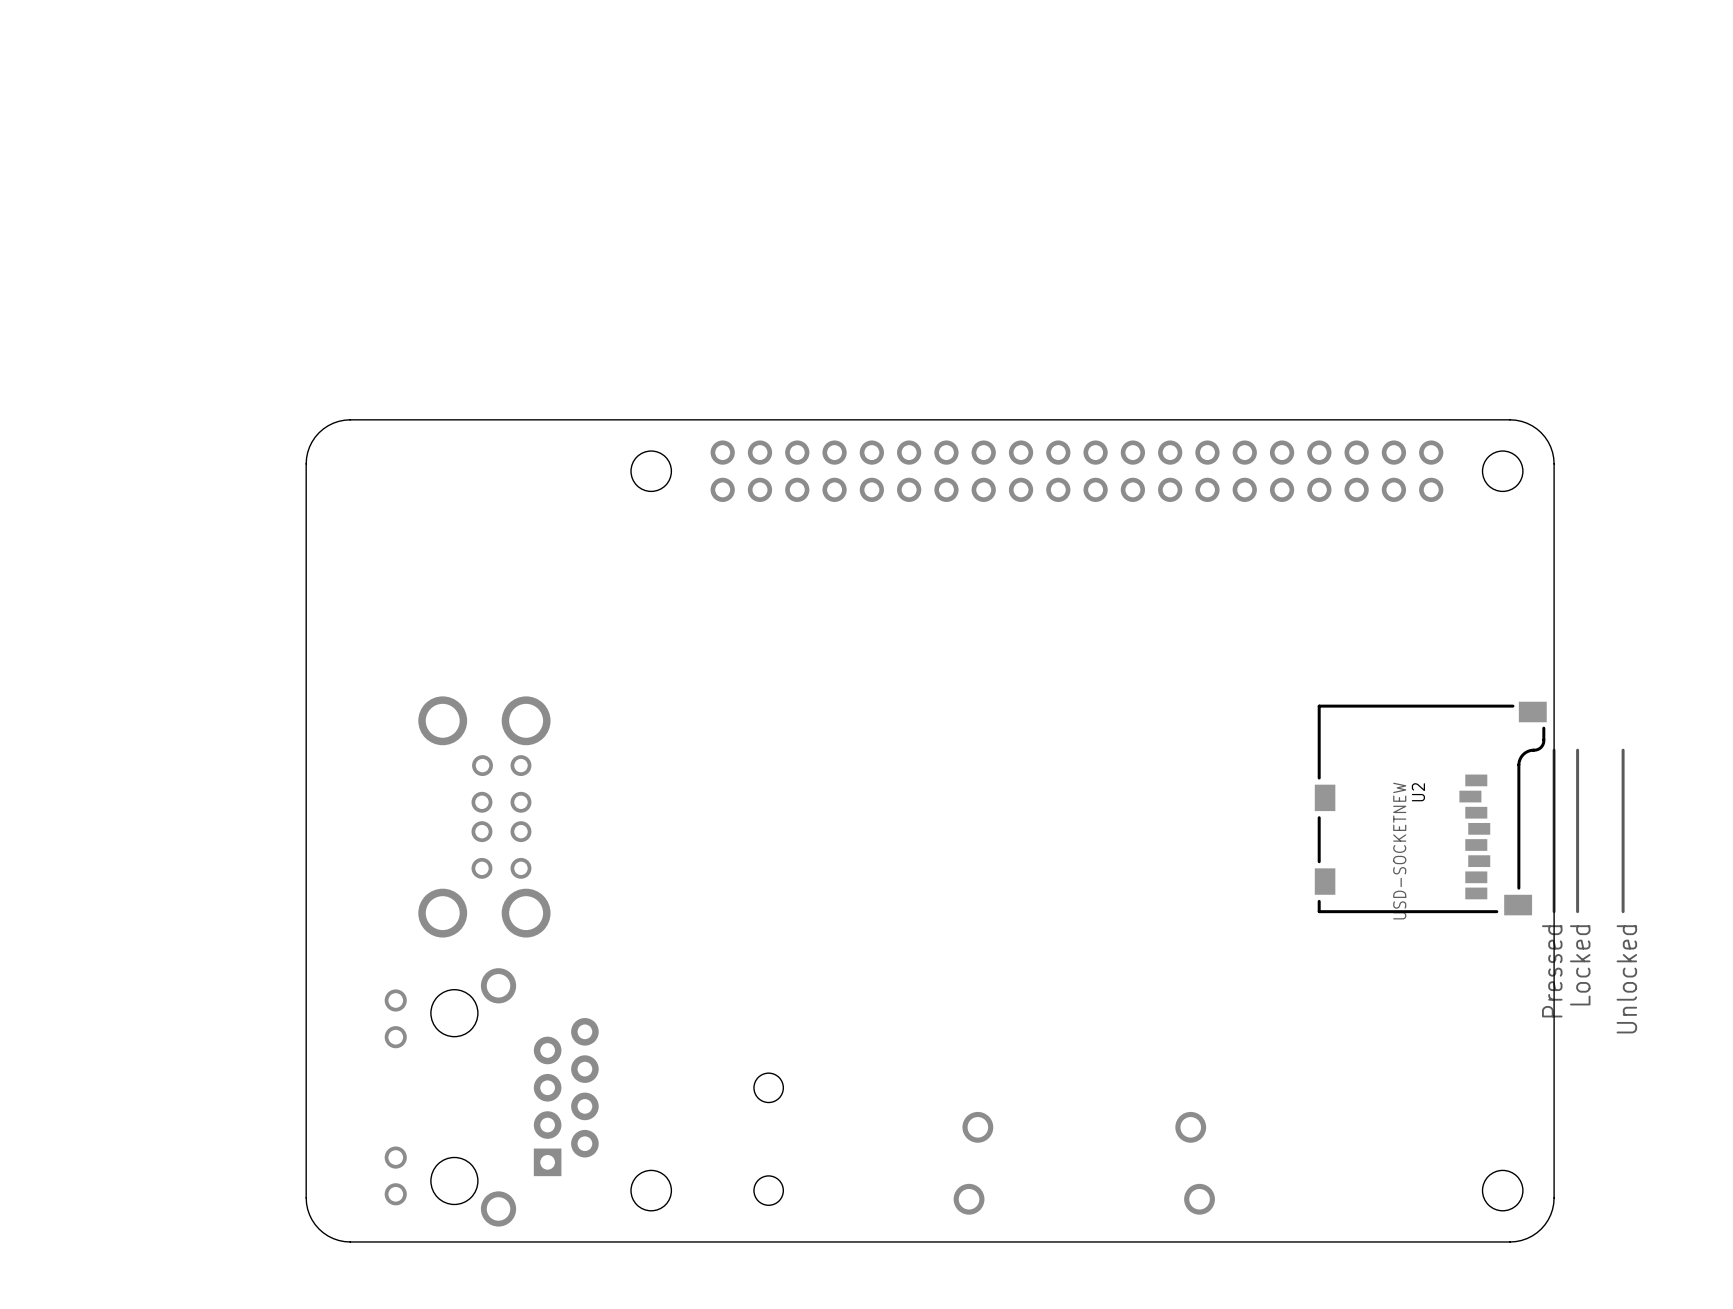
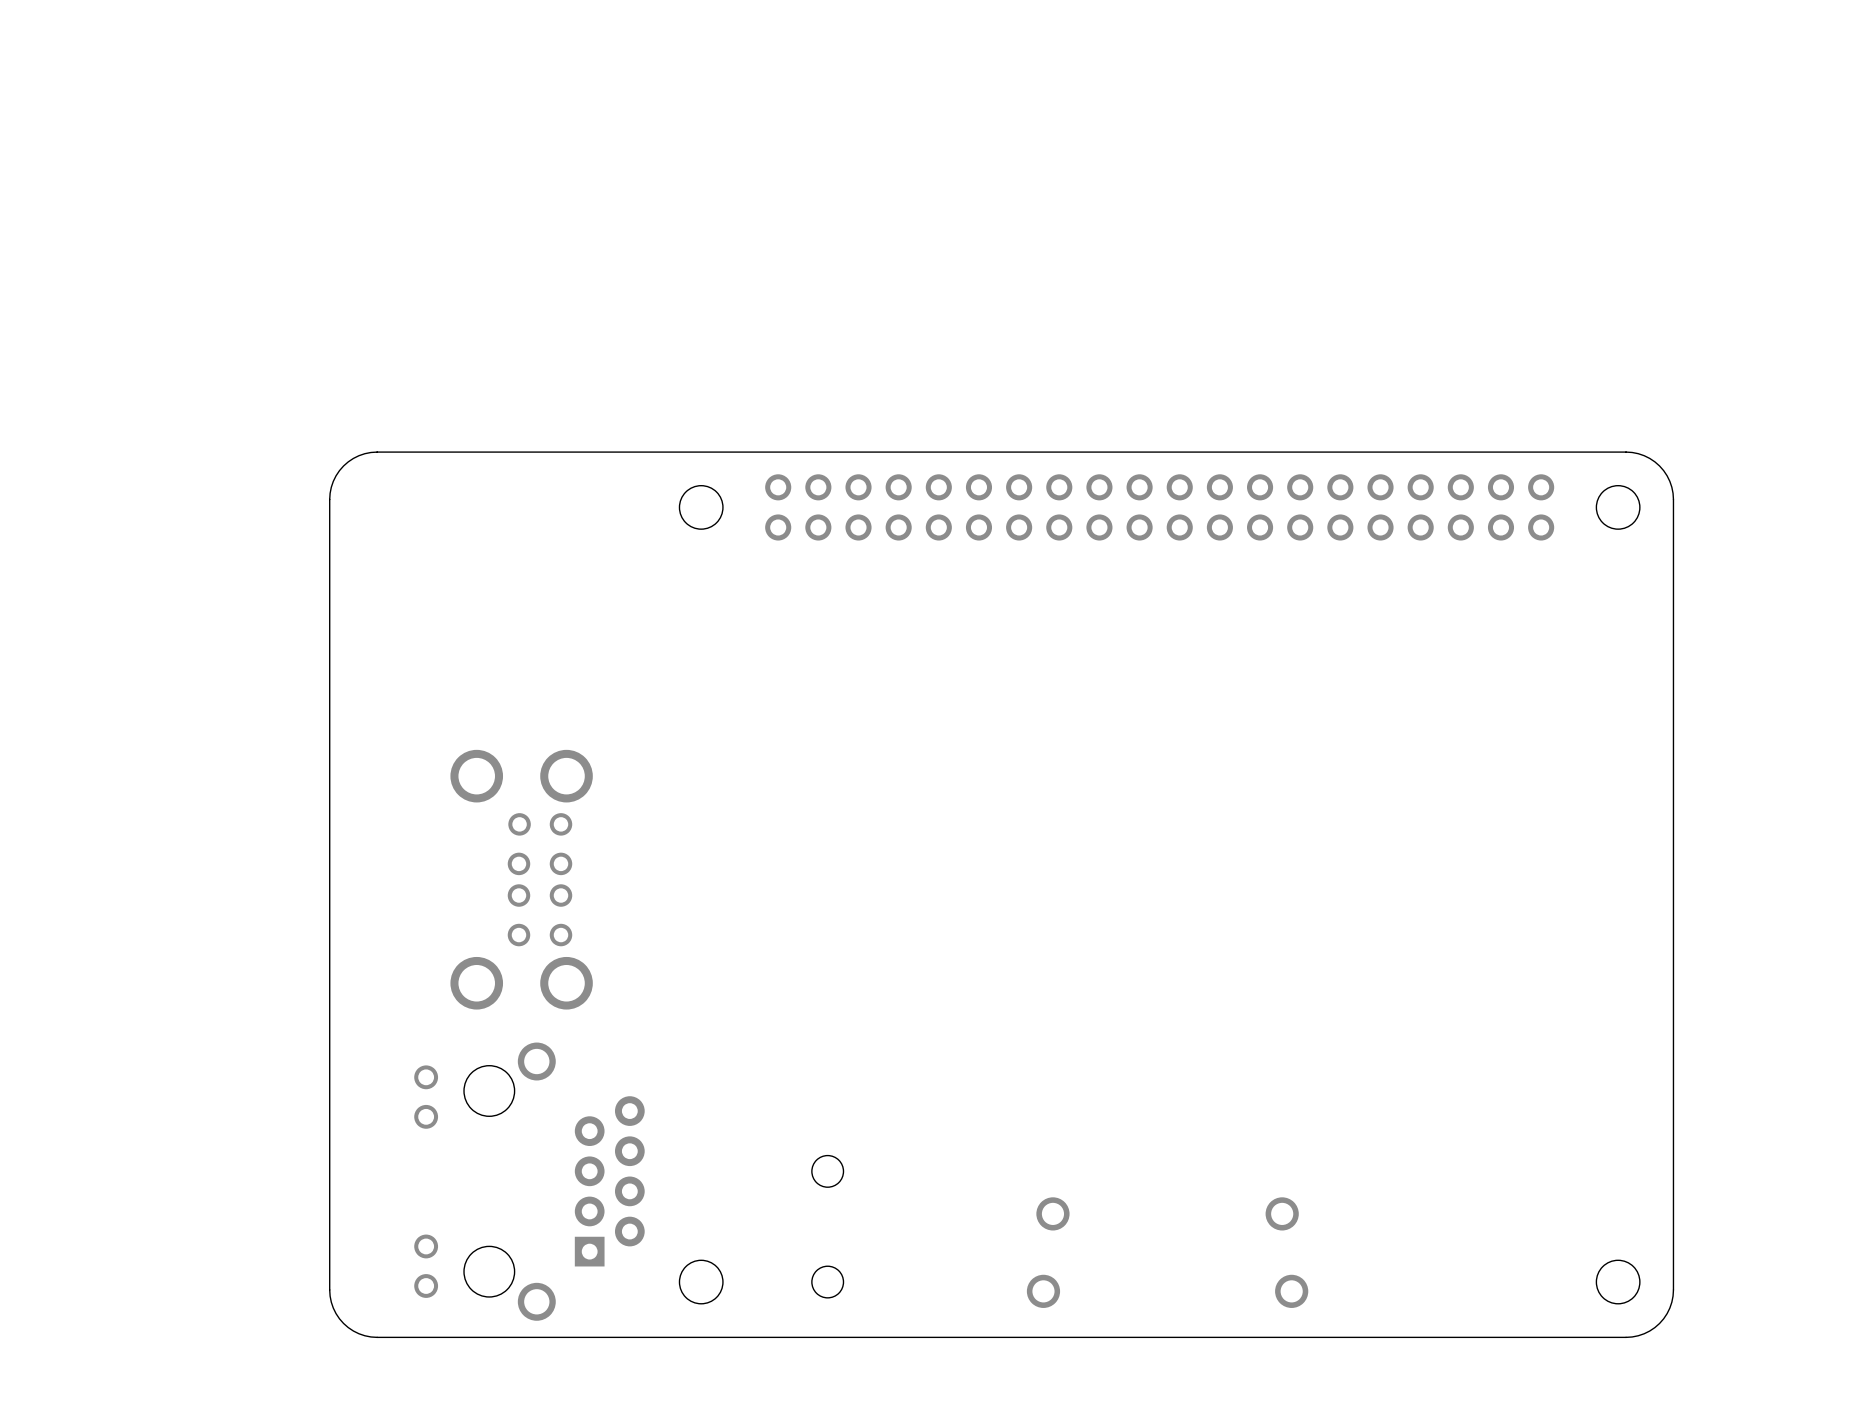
U2: USD-SOCKETNEW (1469, 808) -> none

